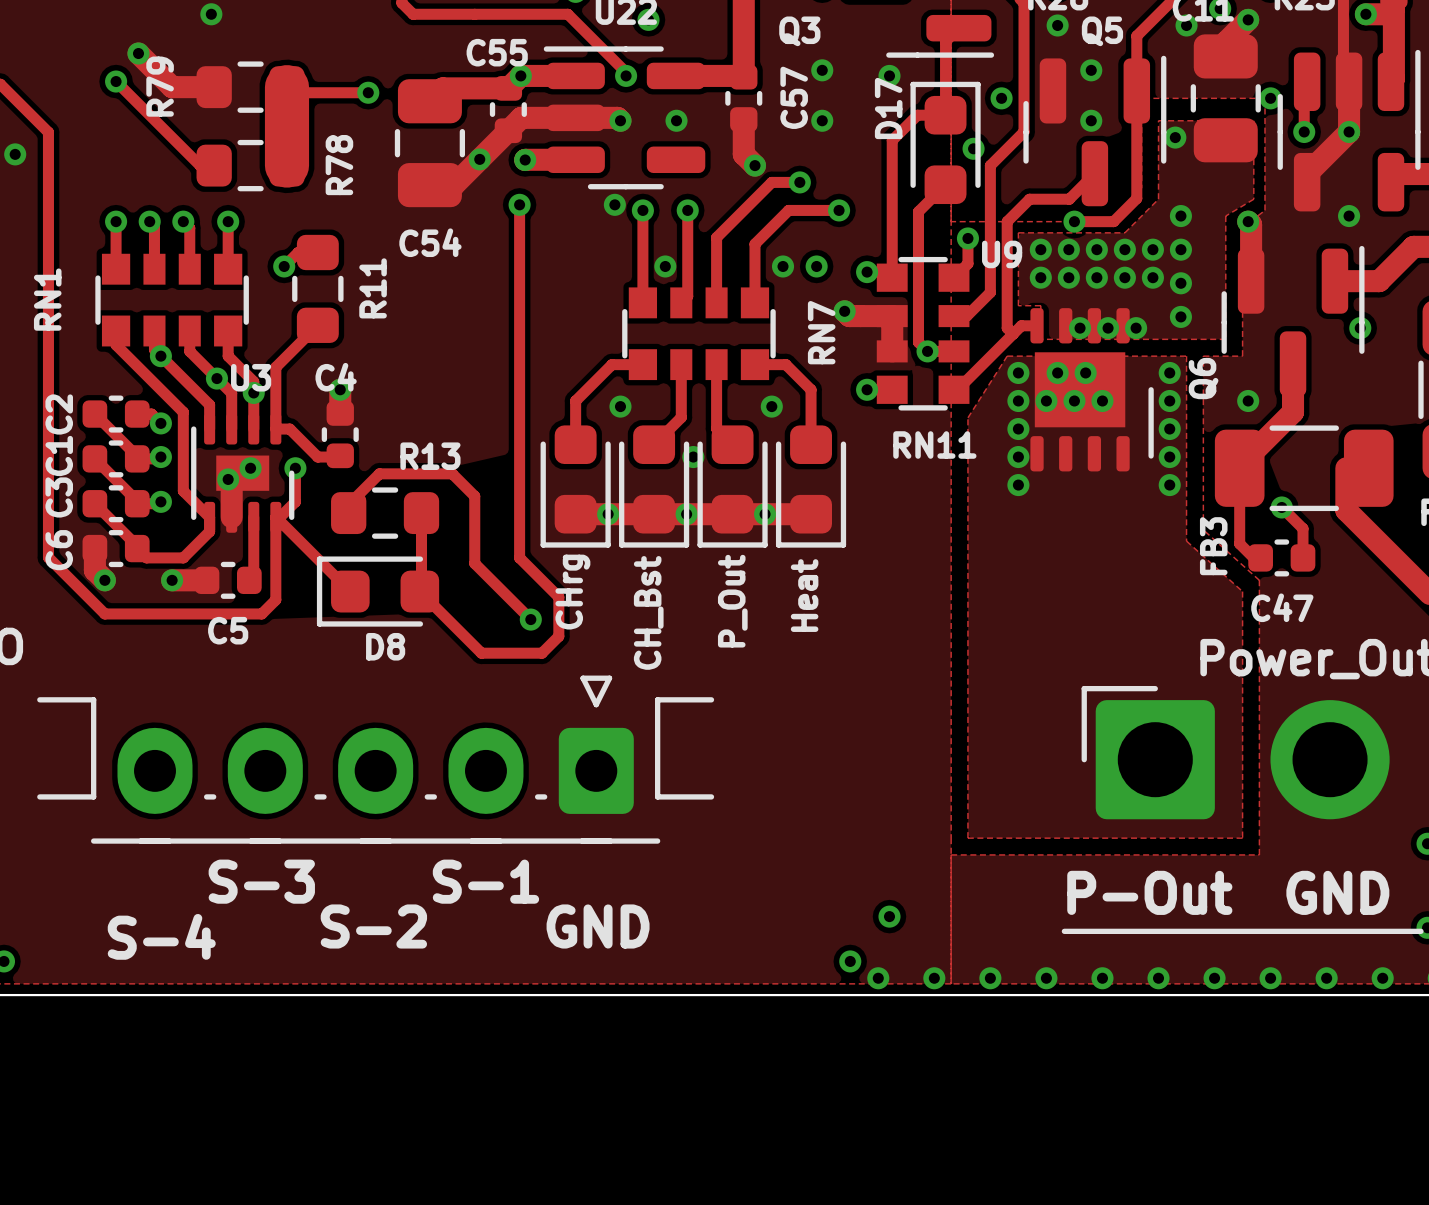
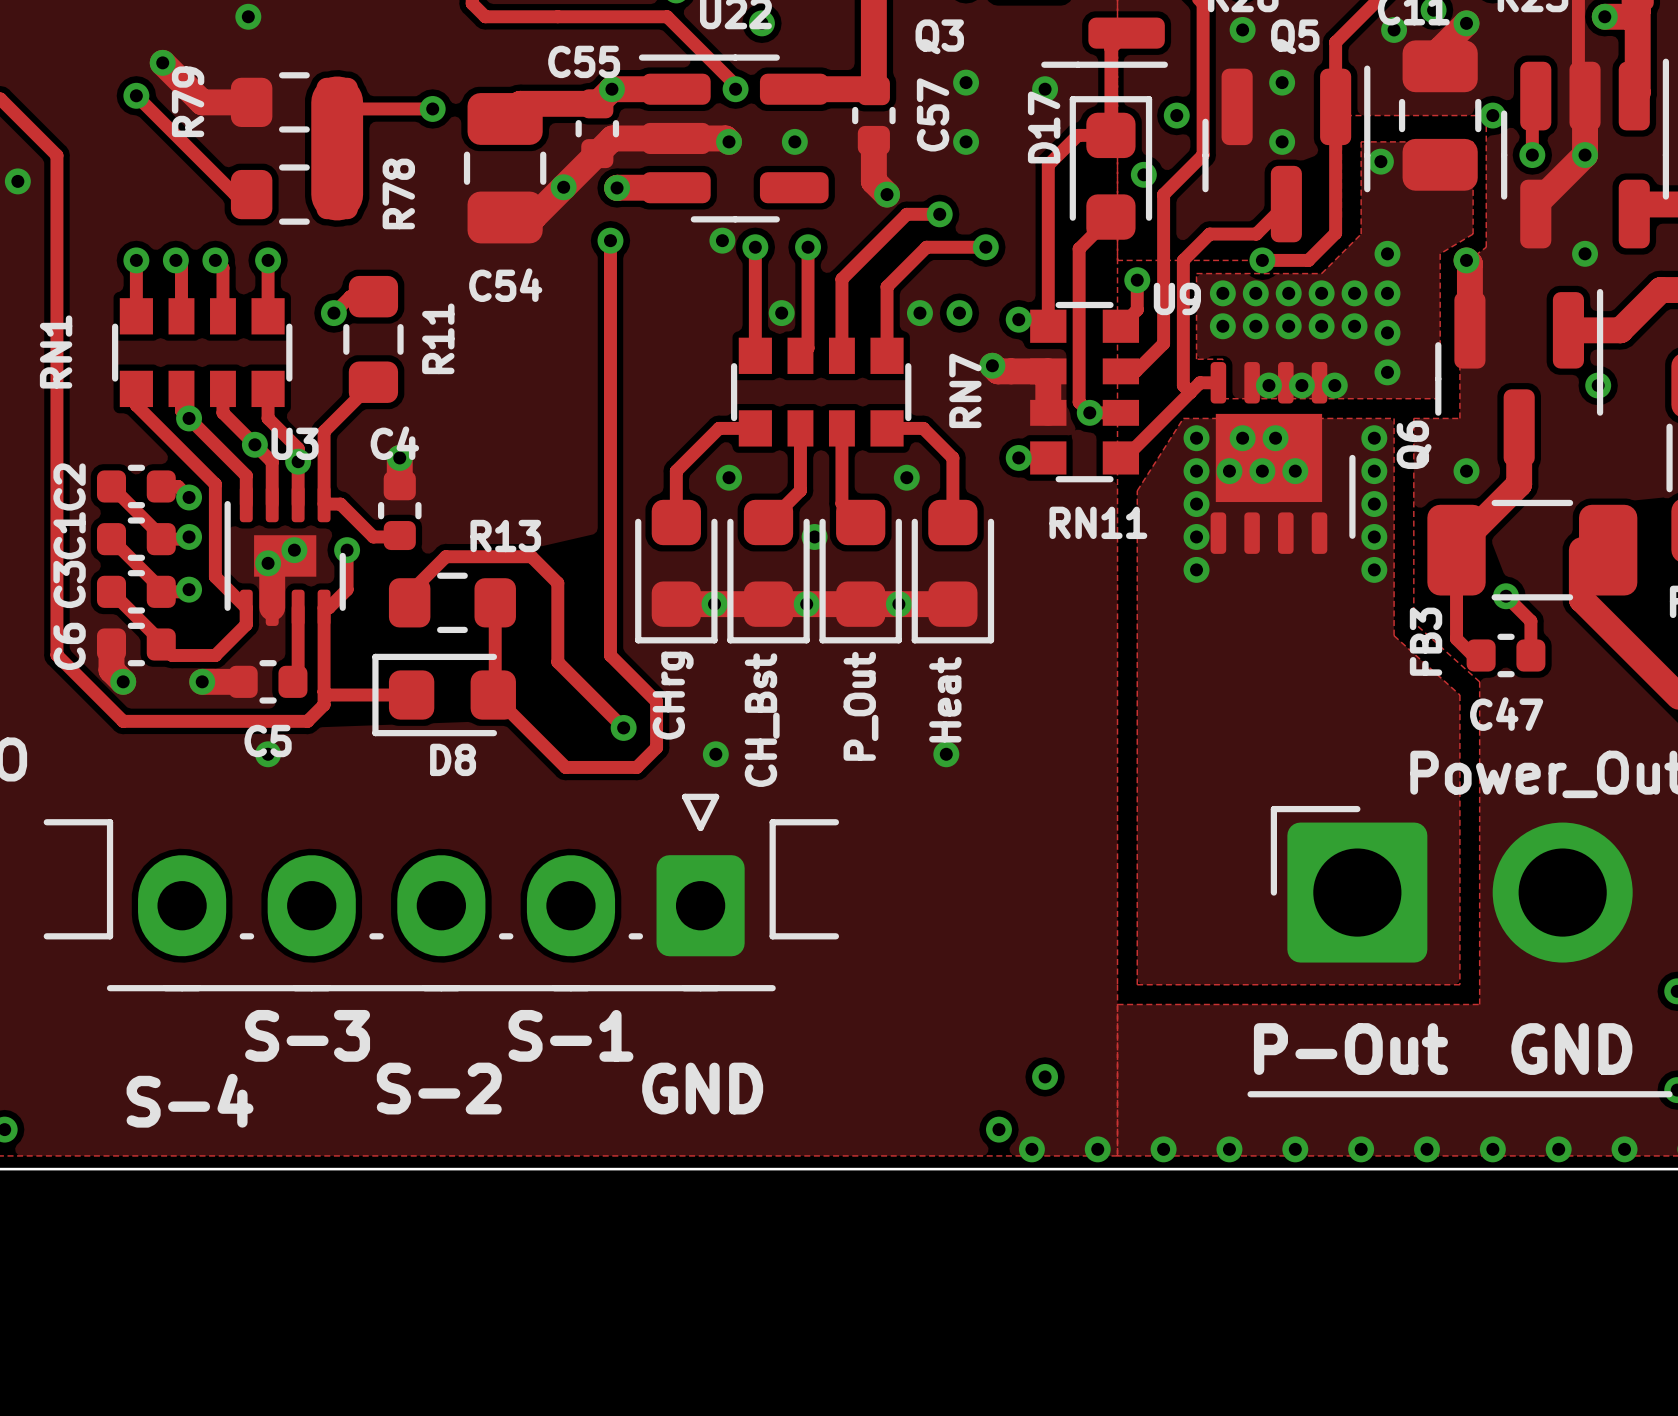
track: (276, 517) (350, 591) -> (324, 691) (327, 695) (411, 695)
via: none -> (268, 754)
via: none -> (715, 754)
via: none -> (946, 754)

